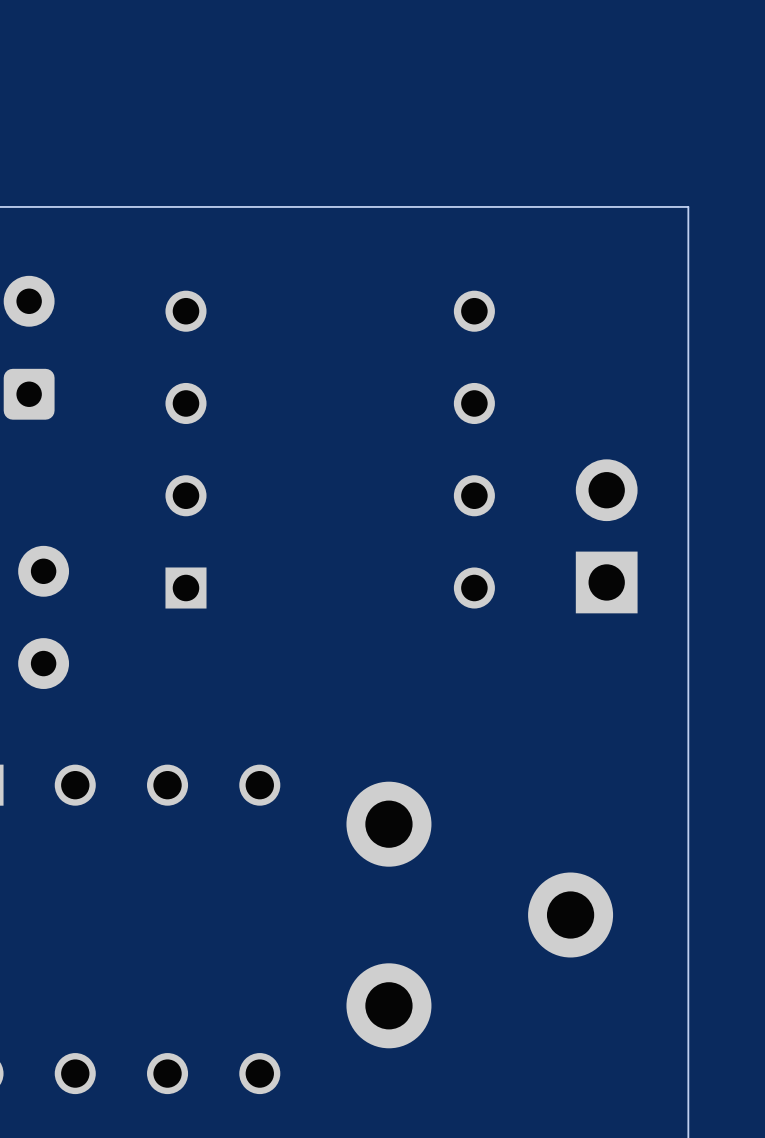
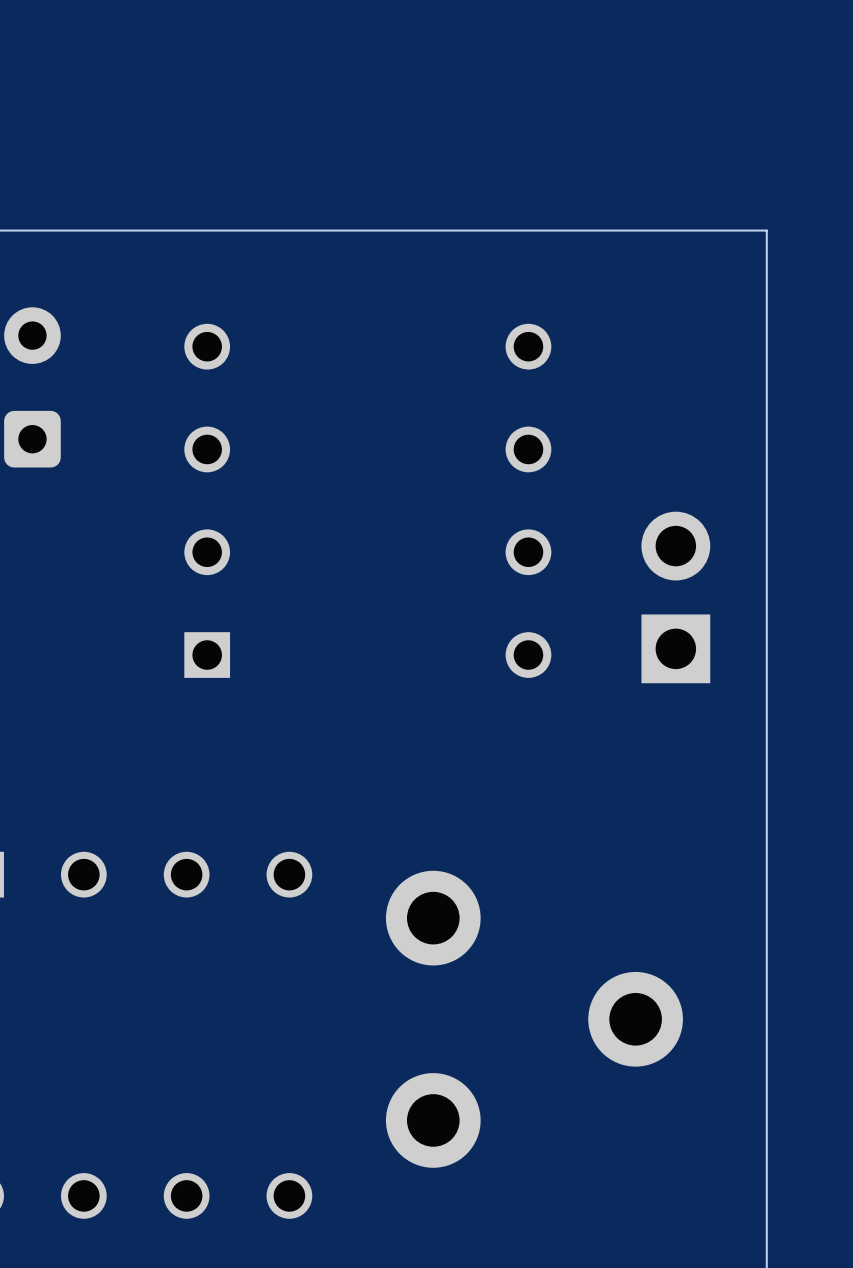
part: (43, 617) -> none

